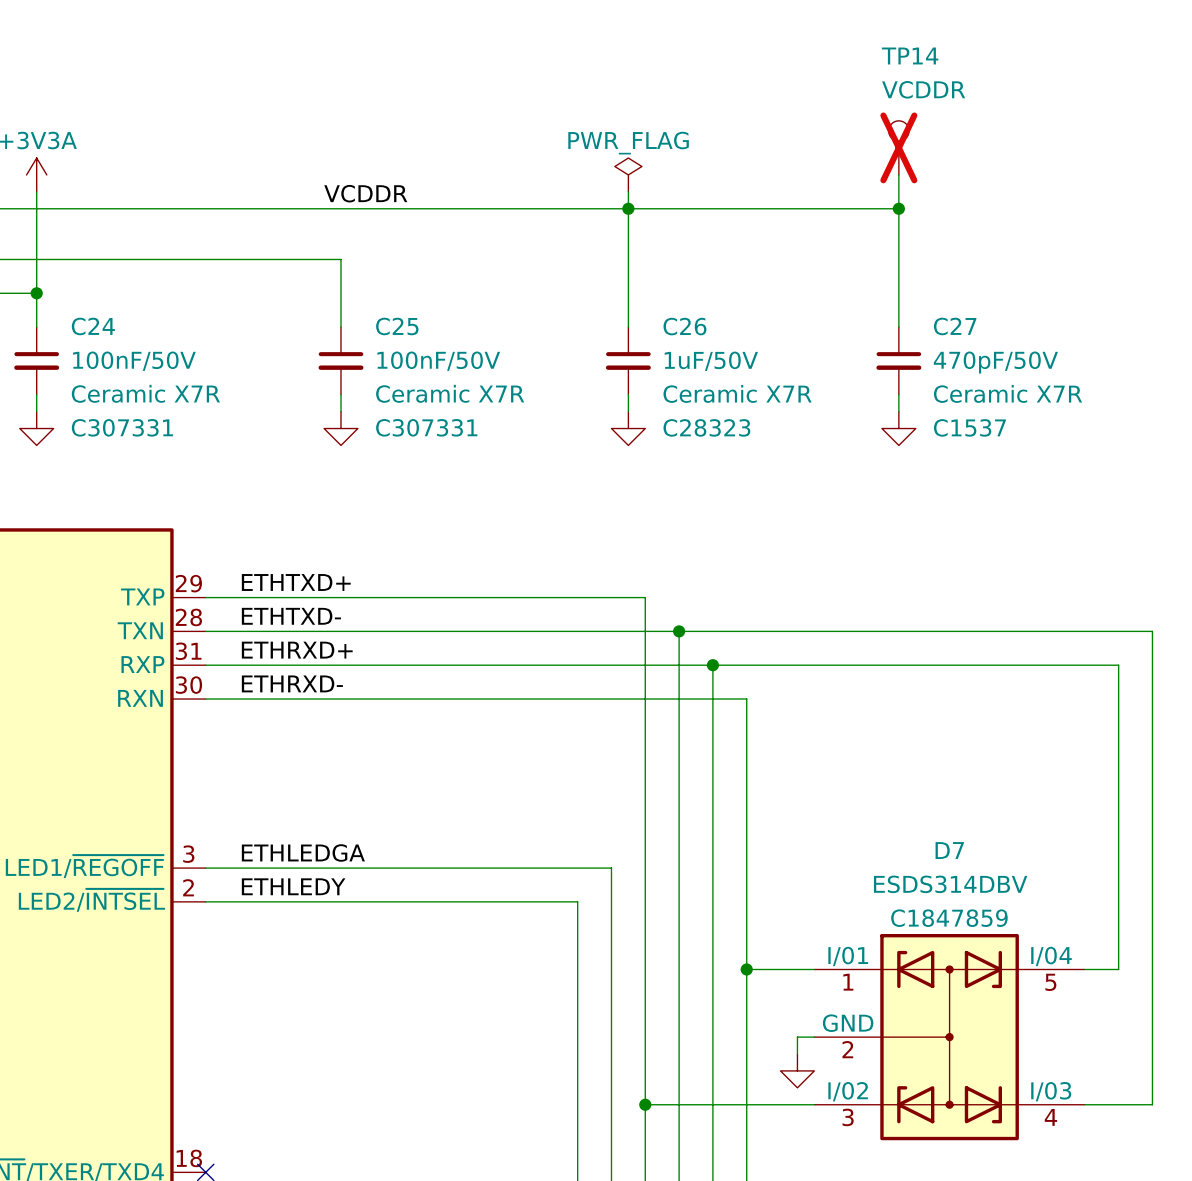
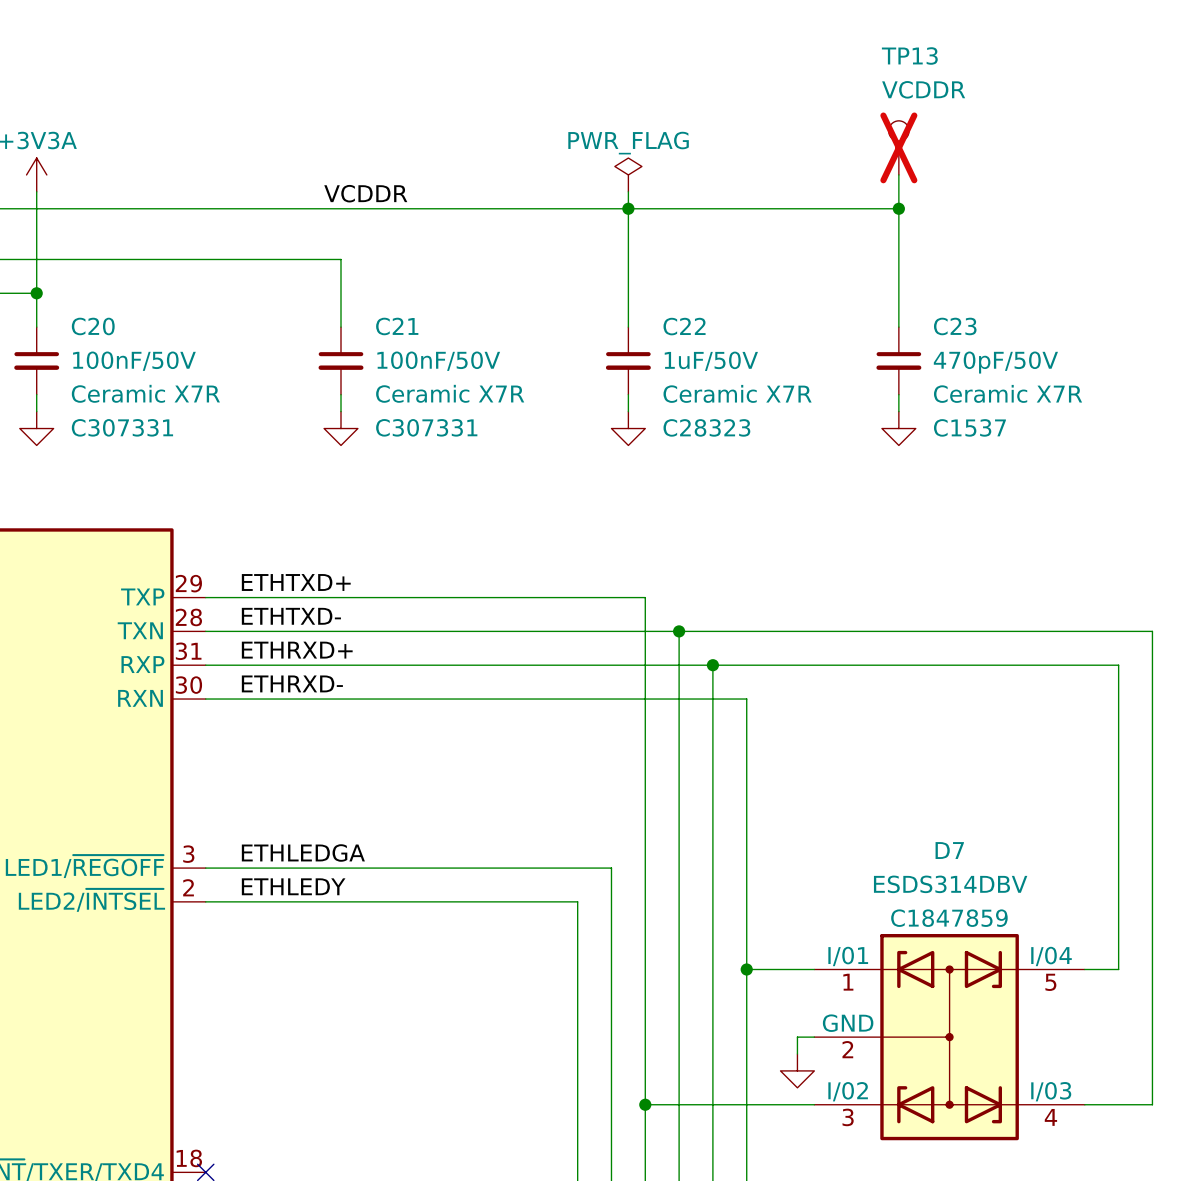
TP14 name: TP14 (910, 55) -> TP13 (909, 56)
C24 name: C24 (93, 326) -> C20 (93, 326)
C25 name: C25 (397, 326) -> C21 (397, 326)
C26 name: C26 (684, 326) -> C22 (684, 326)
C27 name: C27 (955, 326) -> C23 (955, 326)

